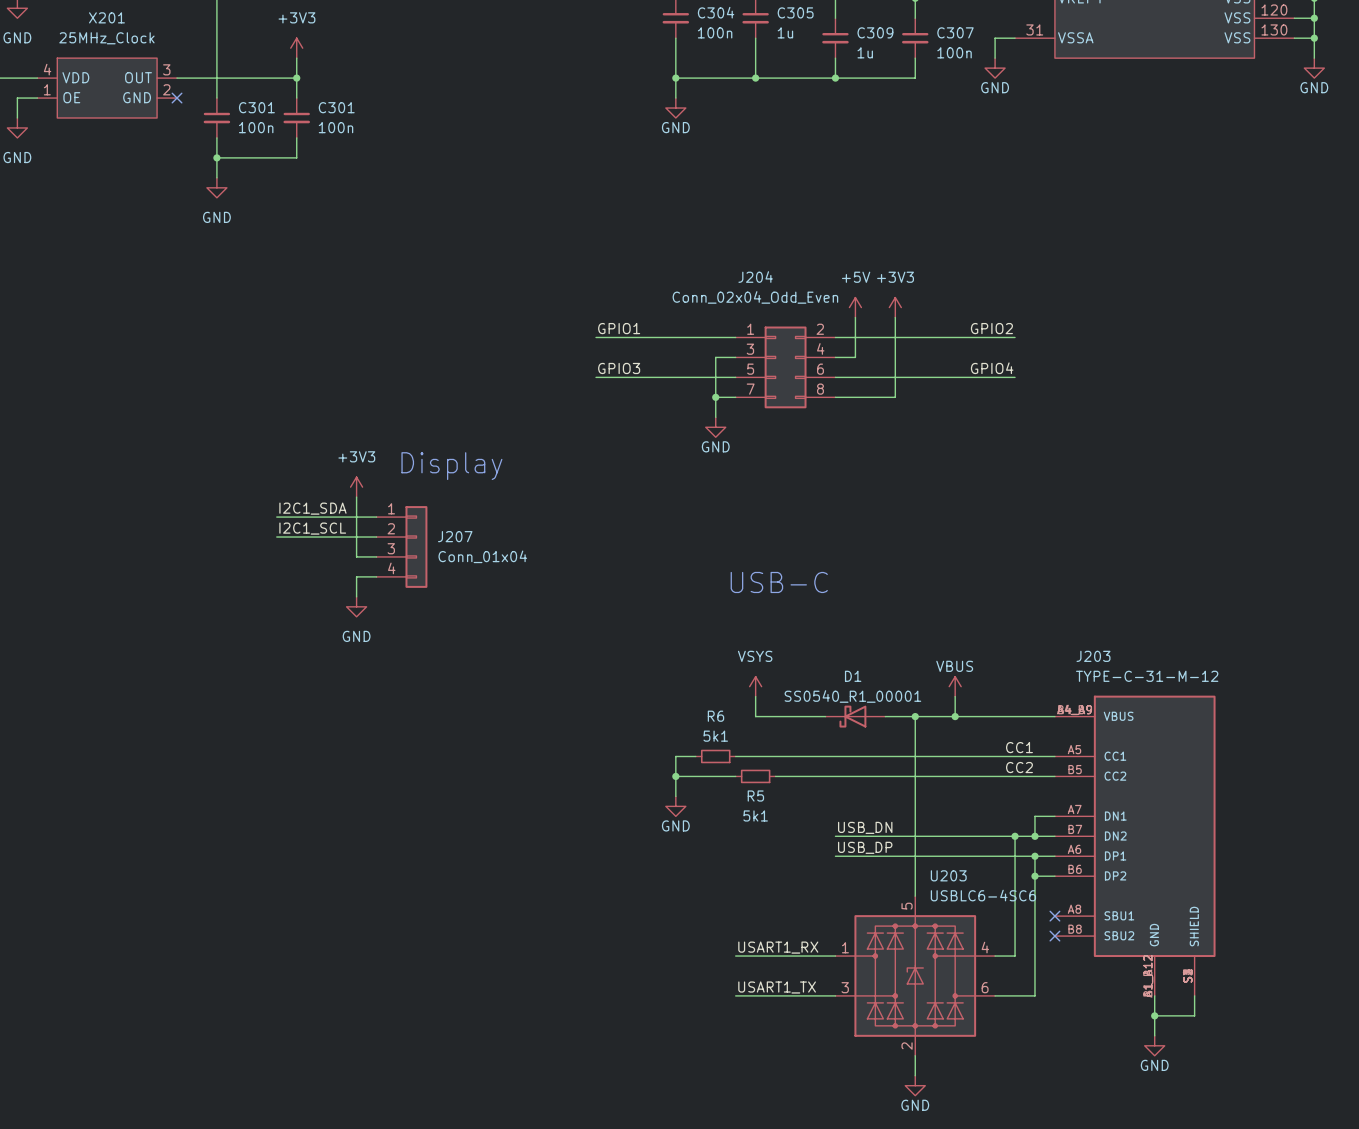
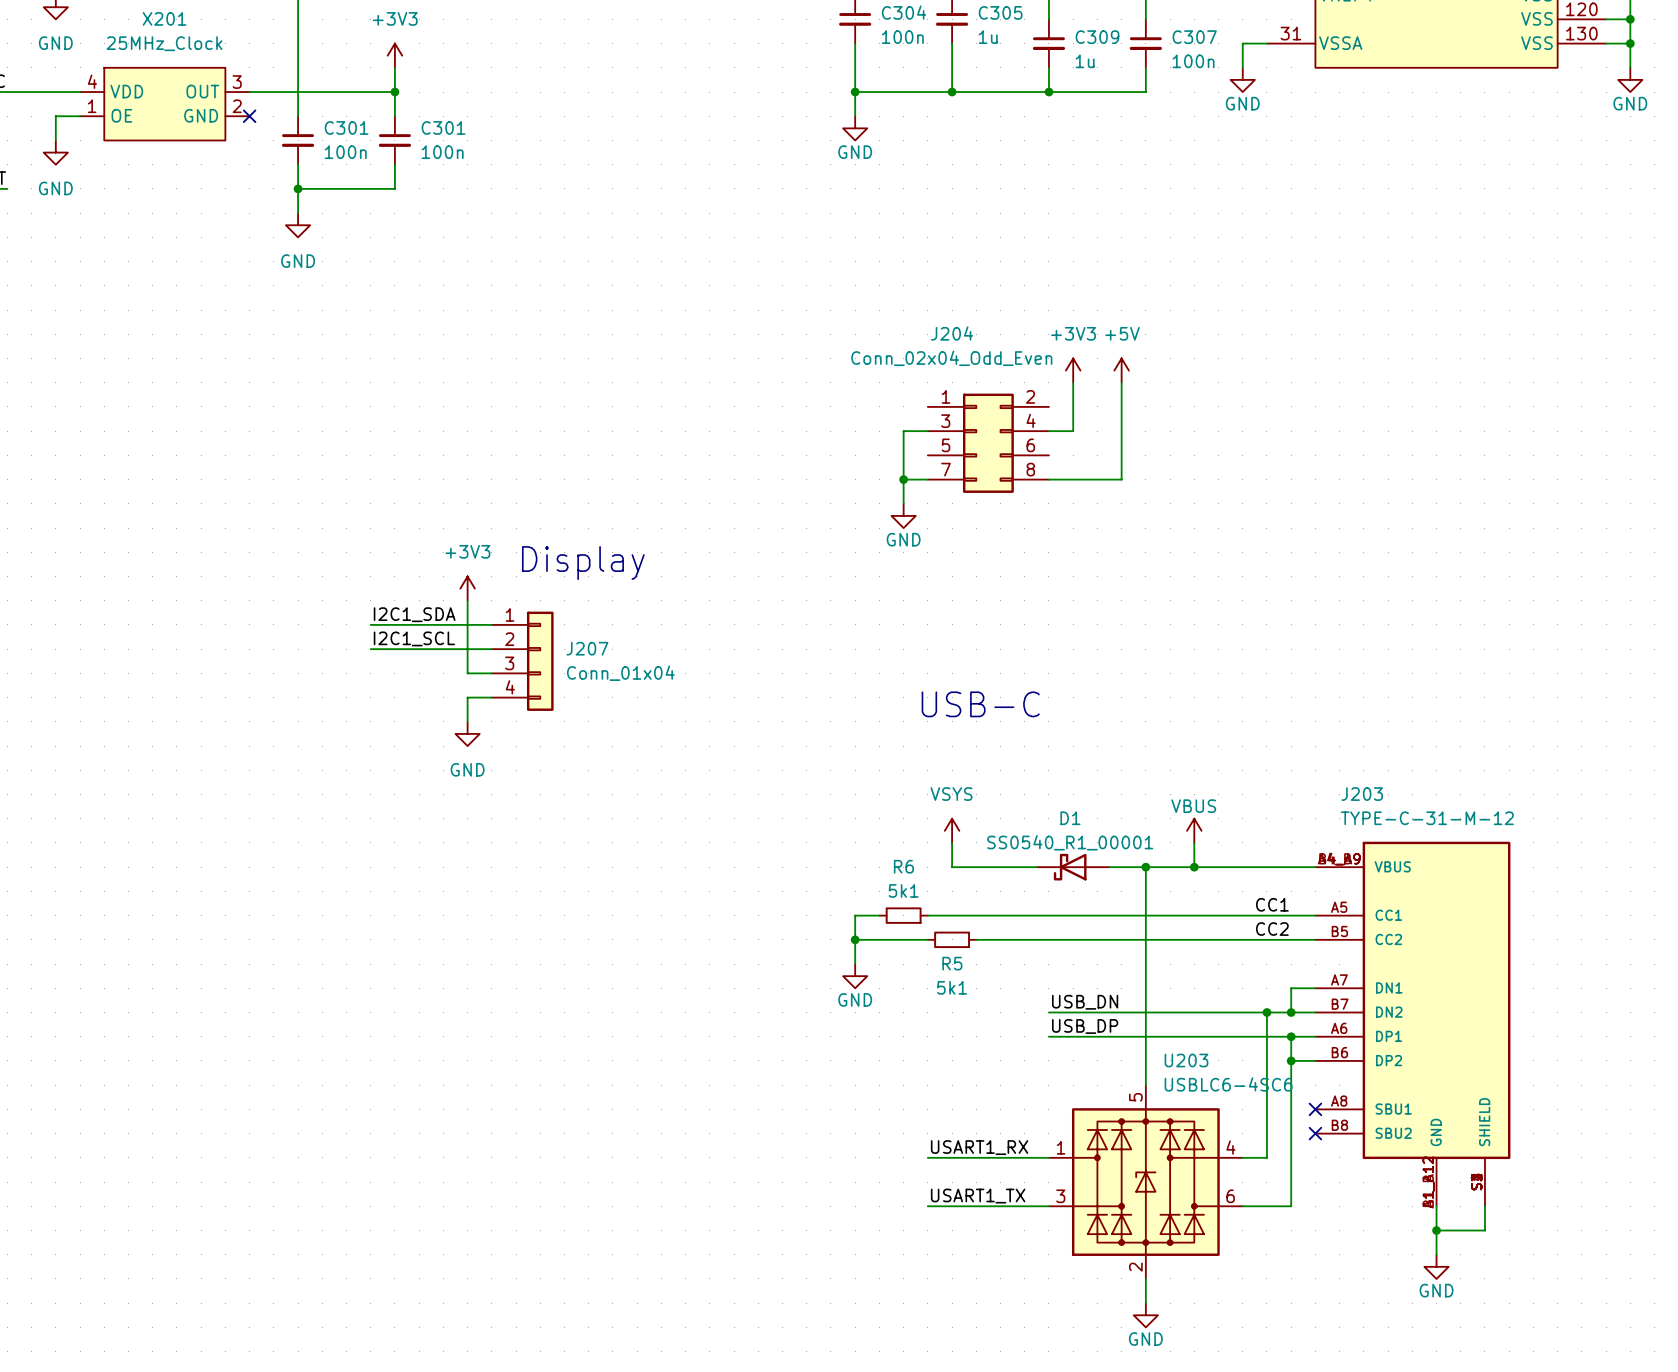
power symbol: +5V (855, 307) -> +3V3 (1073, 370)
power symbol: +3V3 (895, 307) -> +5V (1121, 370)
label: GPIO1 (619, 328) -> none
label: GPIO2 (991, 328) -> none
wire: (596, 337) (735, 337) -> none
wire: (835, 337) (1015, 337) -> none
label: GPIO3 (619, 368) -> none
label: GPIO4 (992, 368) -> none
wire: (596, 377) (735, 377) -> none
wire: (835, 377) (1015, 377) -> none

